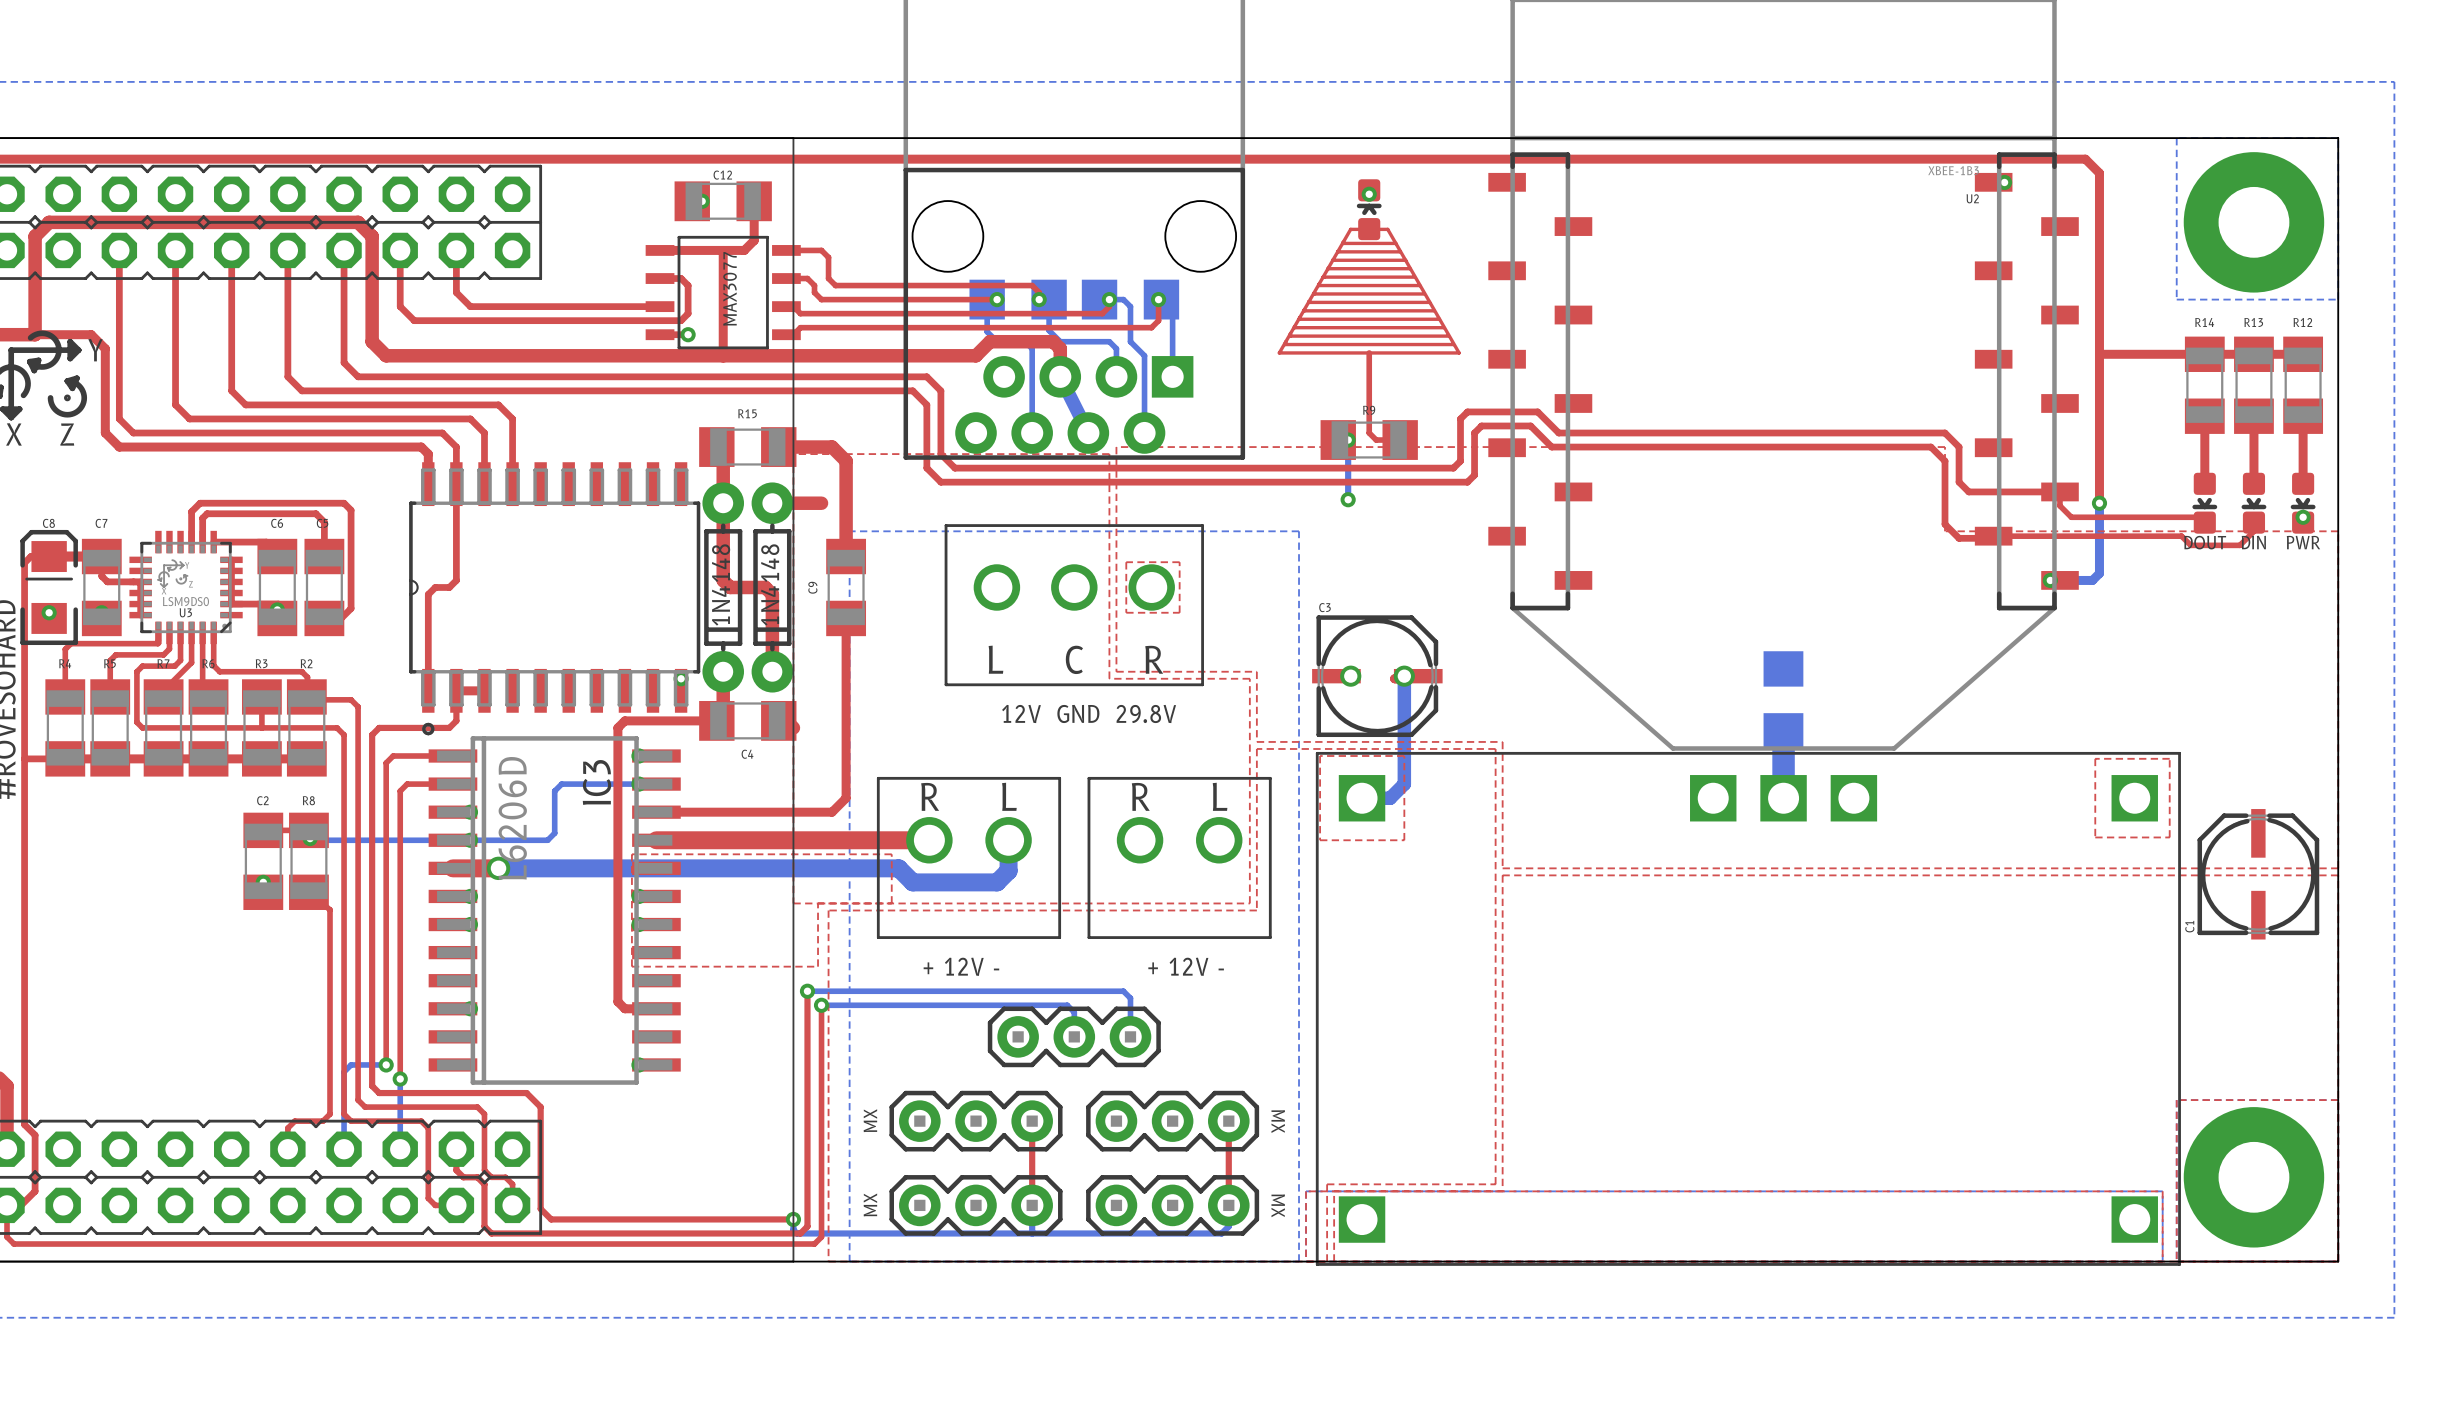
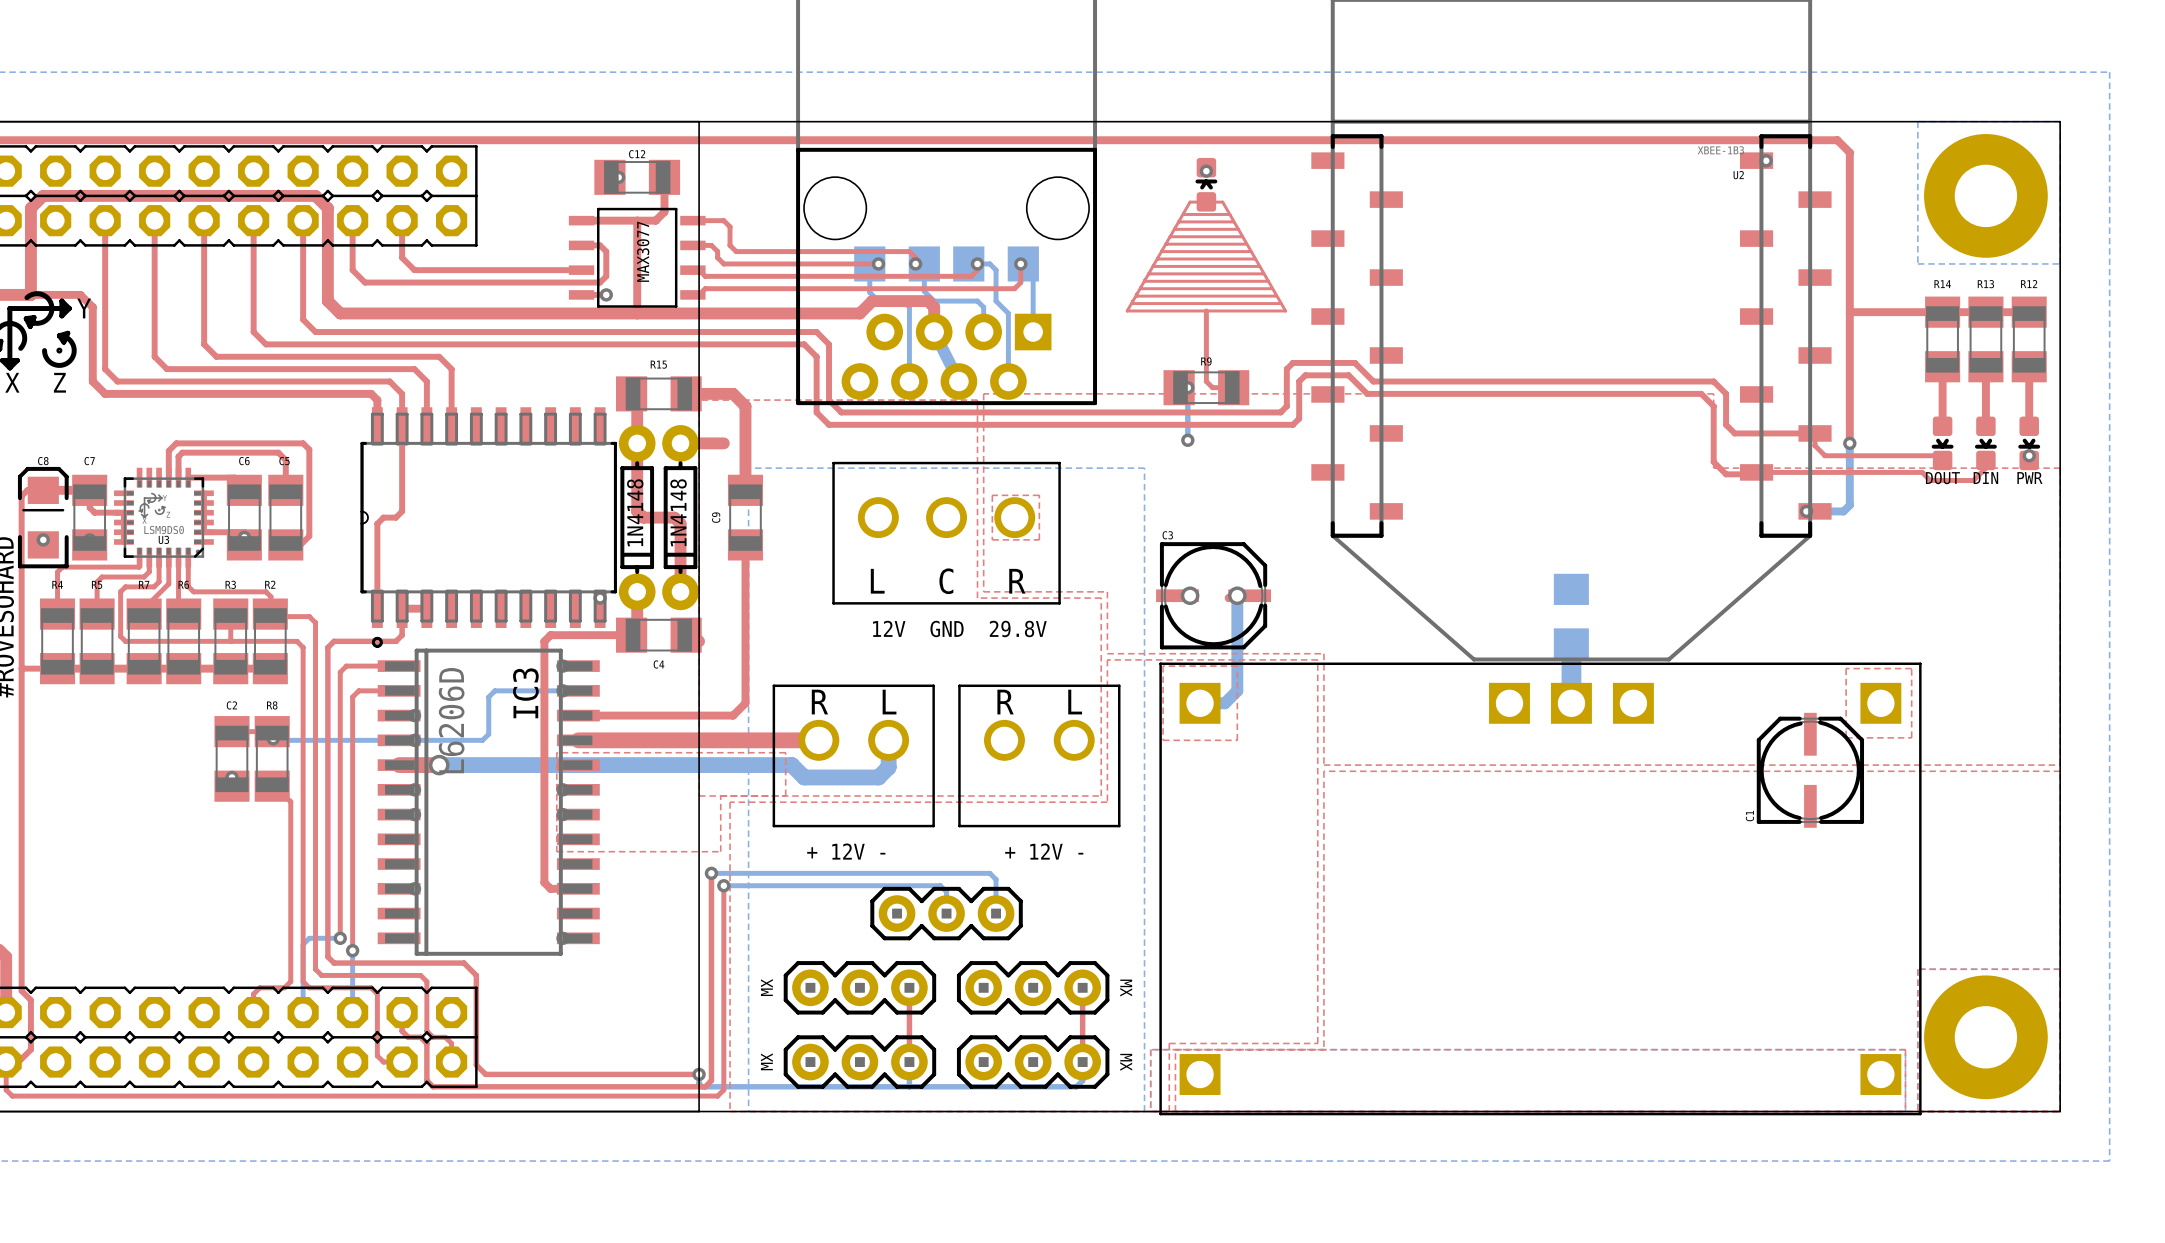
C1 position: (2258, 874) -> (1810, 770)

